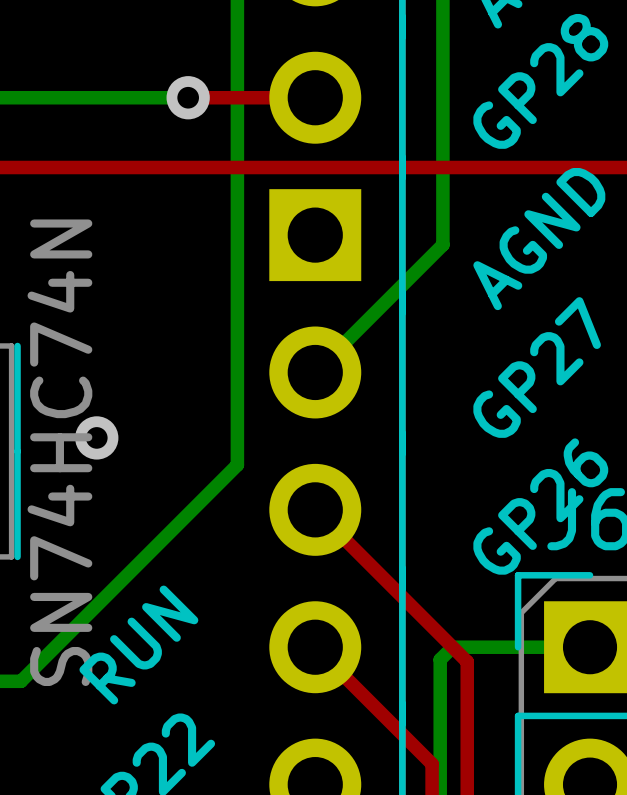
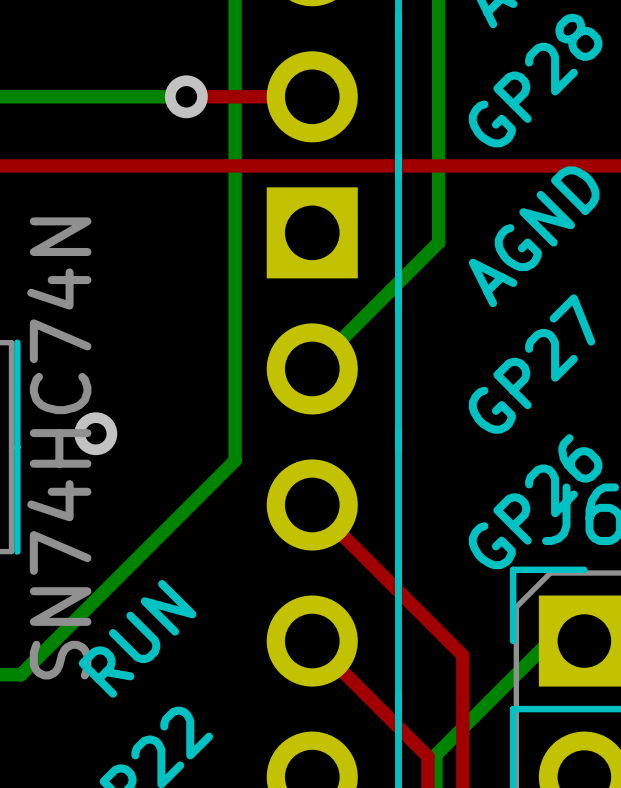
bottom track: (555, 647) (452, 647) (440, 659) (440, 762) -> (549, 641) (436, 754)

